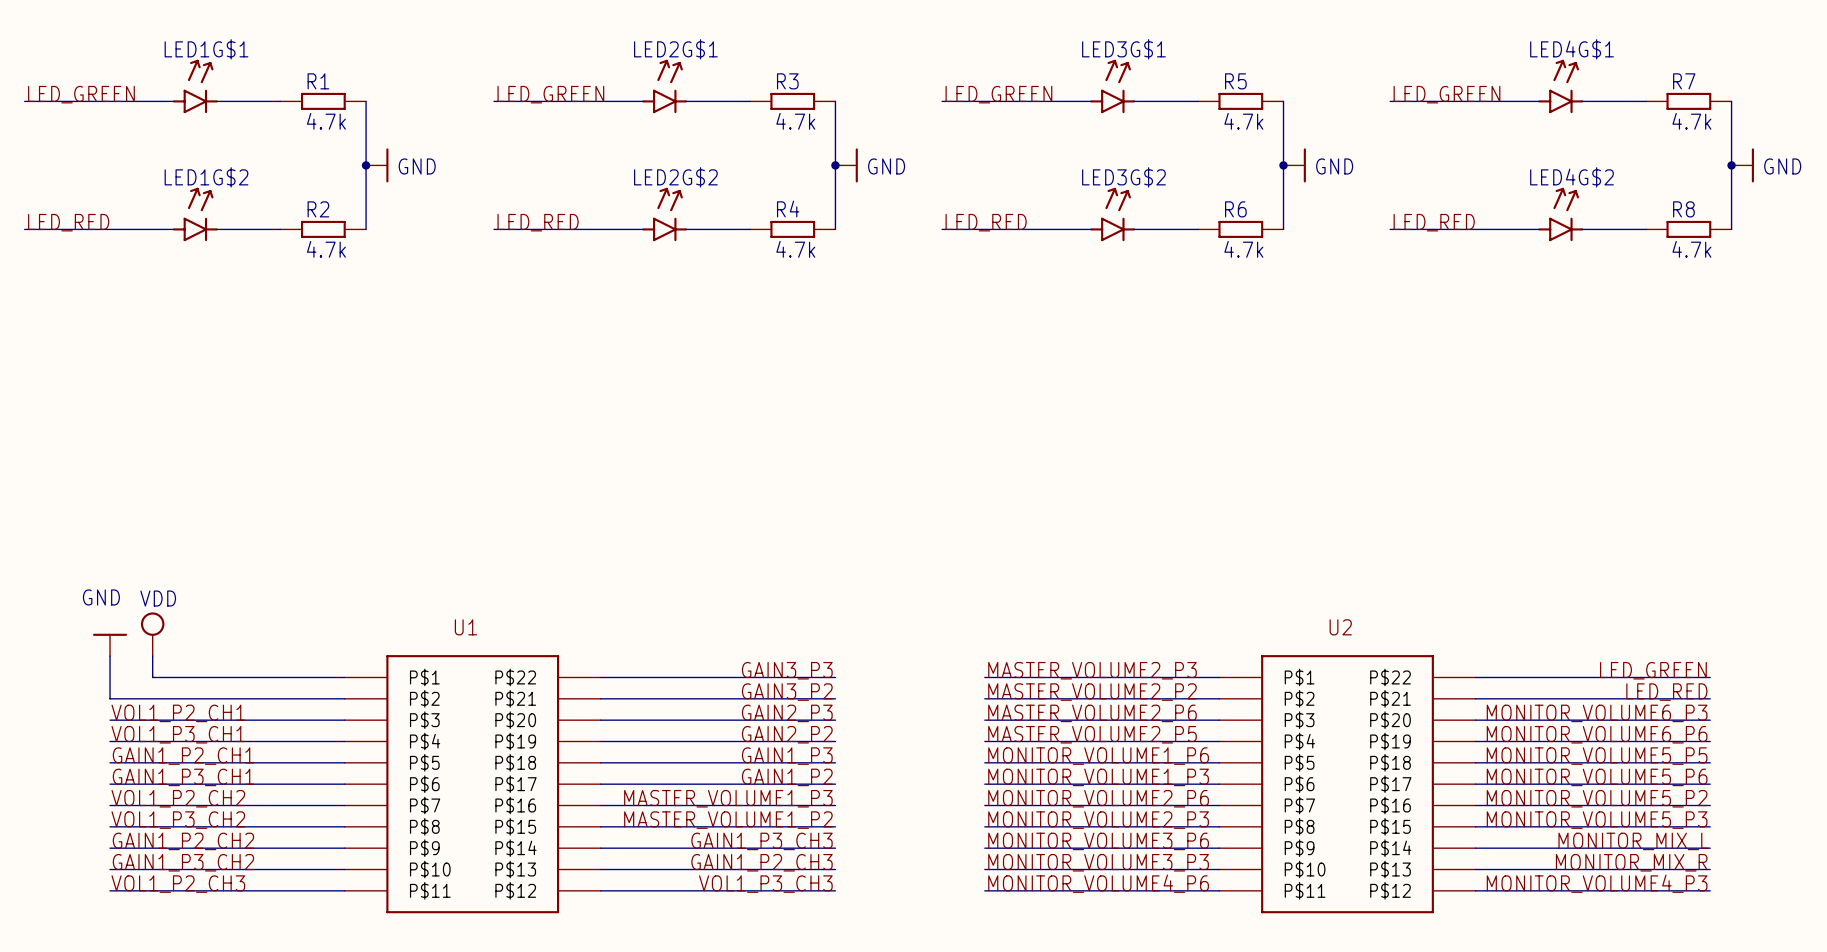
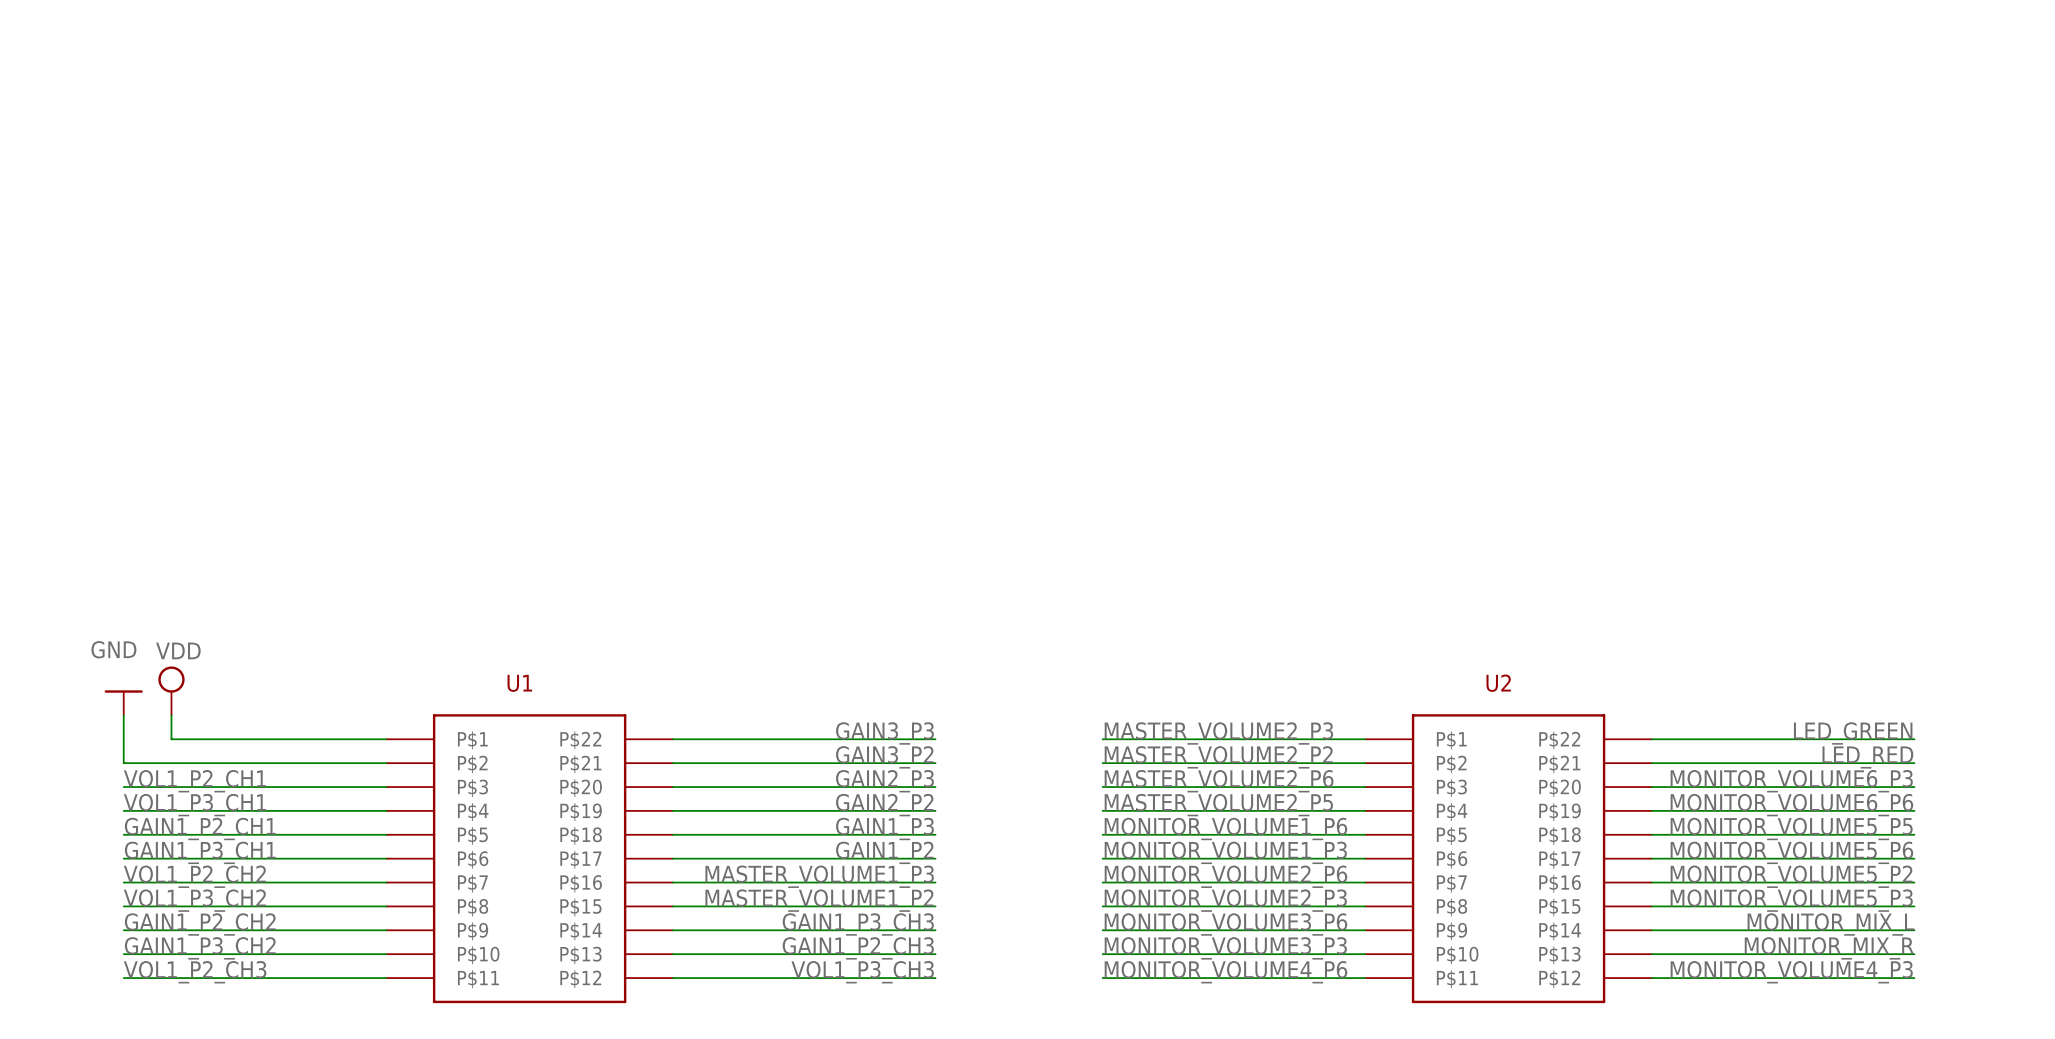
LED1G$1: (195, 86) -> none
LED2G$1: (664, 86) -> none
LED3G$1: (1112, 86) -> none
LED4G$1: (1560, 86) -> none
label: LED_GREEN (81, 94) -> none
label: LED_GREEN (550, 94) -> none
label: LED_GREEN (998, 94) -> none
label: LED_GREEN (1446, 94) -> none
wire: (24, 101) (174, 101) -> none
wire: (216, 101) (280, 101) -> none
R1: 4.7k (323, 101) -> none
wire: (366, 101) (366, 229) -> none
wire: (494, 101) (643, 101) -> none
wire: (686, 101) (750, 101) -> none
R3: 4.7k (792, 101) -> none
wire: (835, 101) (835, 229) -> none
wire: (942, 101) (1091, 101) -> none
wire: (1134, 101) (1198, 101) -> none
R5: 4.7k (1240, 101) -> none
wire: (1283, 101) (1283, 229) -> none
wire: (1390, 101) (1539, 101) -> none
wire: (1582, 101) (1646, 101) -> none
R7: 4.7k (1688, 101) -> none
wire: (1731, 101) (1731, 229) -> none
junction: (366, 165) -> none
power symbol: GND (377, 165) -> none
junction: (835, 165) -> none
power symbol: GND (846, 165) -> none
junction: (1283, 165) -> none
power symbol: GND (1294, 165) -> none
junction: (1731, 165) -> none
power symbol: GND (1742, 165) -> none
LED1G$2: (195, 214) -> none
LED2G$2: (664, 214) -> none
LED3G$2: (1112, 214) -> none
LED4G$2: (1560, 214) -> none
label: LED_RED (68, 222) -> none
label: LED_RED (538, 222) -> none
label: LED_RED (986, 222) -> none
label: LED_RED (1434, 222) -> none
wire: (24, 229) (174, 229) -> none
wire: (216, 229) (280, 229) -> none
R2: 4.7k (323, 229) -> none
wire: (494, 229) (643, 229) -> none
wire: (686, 229) (750, 229) -> none
R4: 4.7k (792, 229) -> none
wire: (942, 229) (1091, 229) -> none
wire: (1134, 229) (1198, 229) -> none
R6: 4.7k (1240, 229) -> none
wire: (1390, 229) (1539, 229) -> none
wire: (1582, 229) (1646, 229) -> none
R8: 4.7k (1688, 229) -> none

